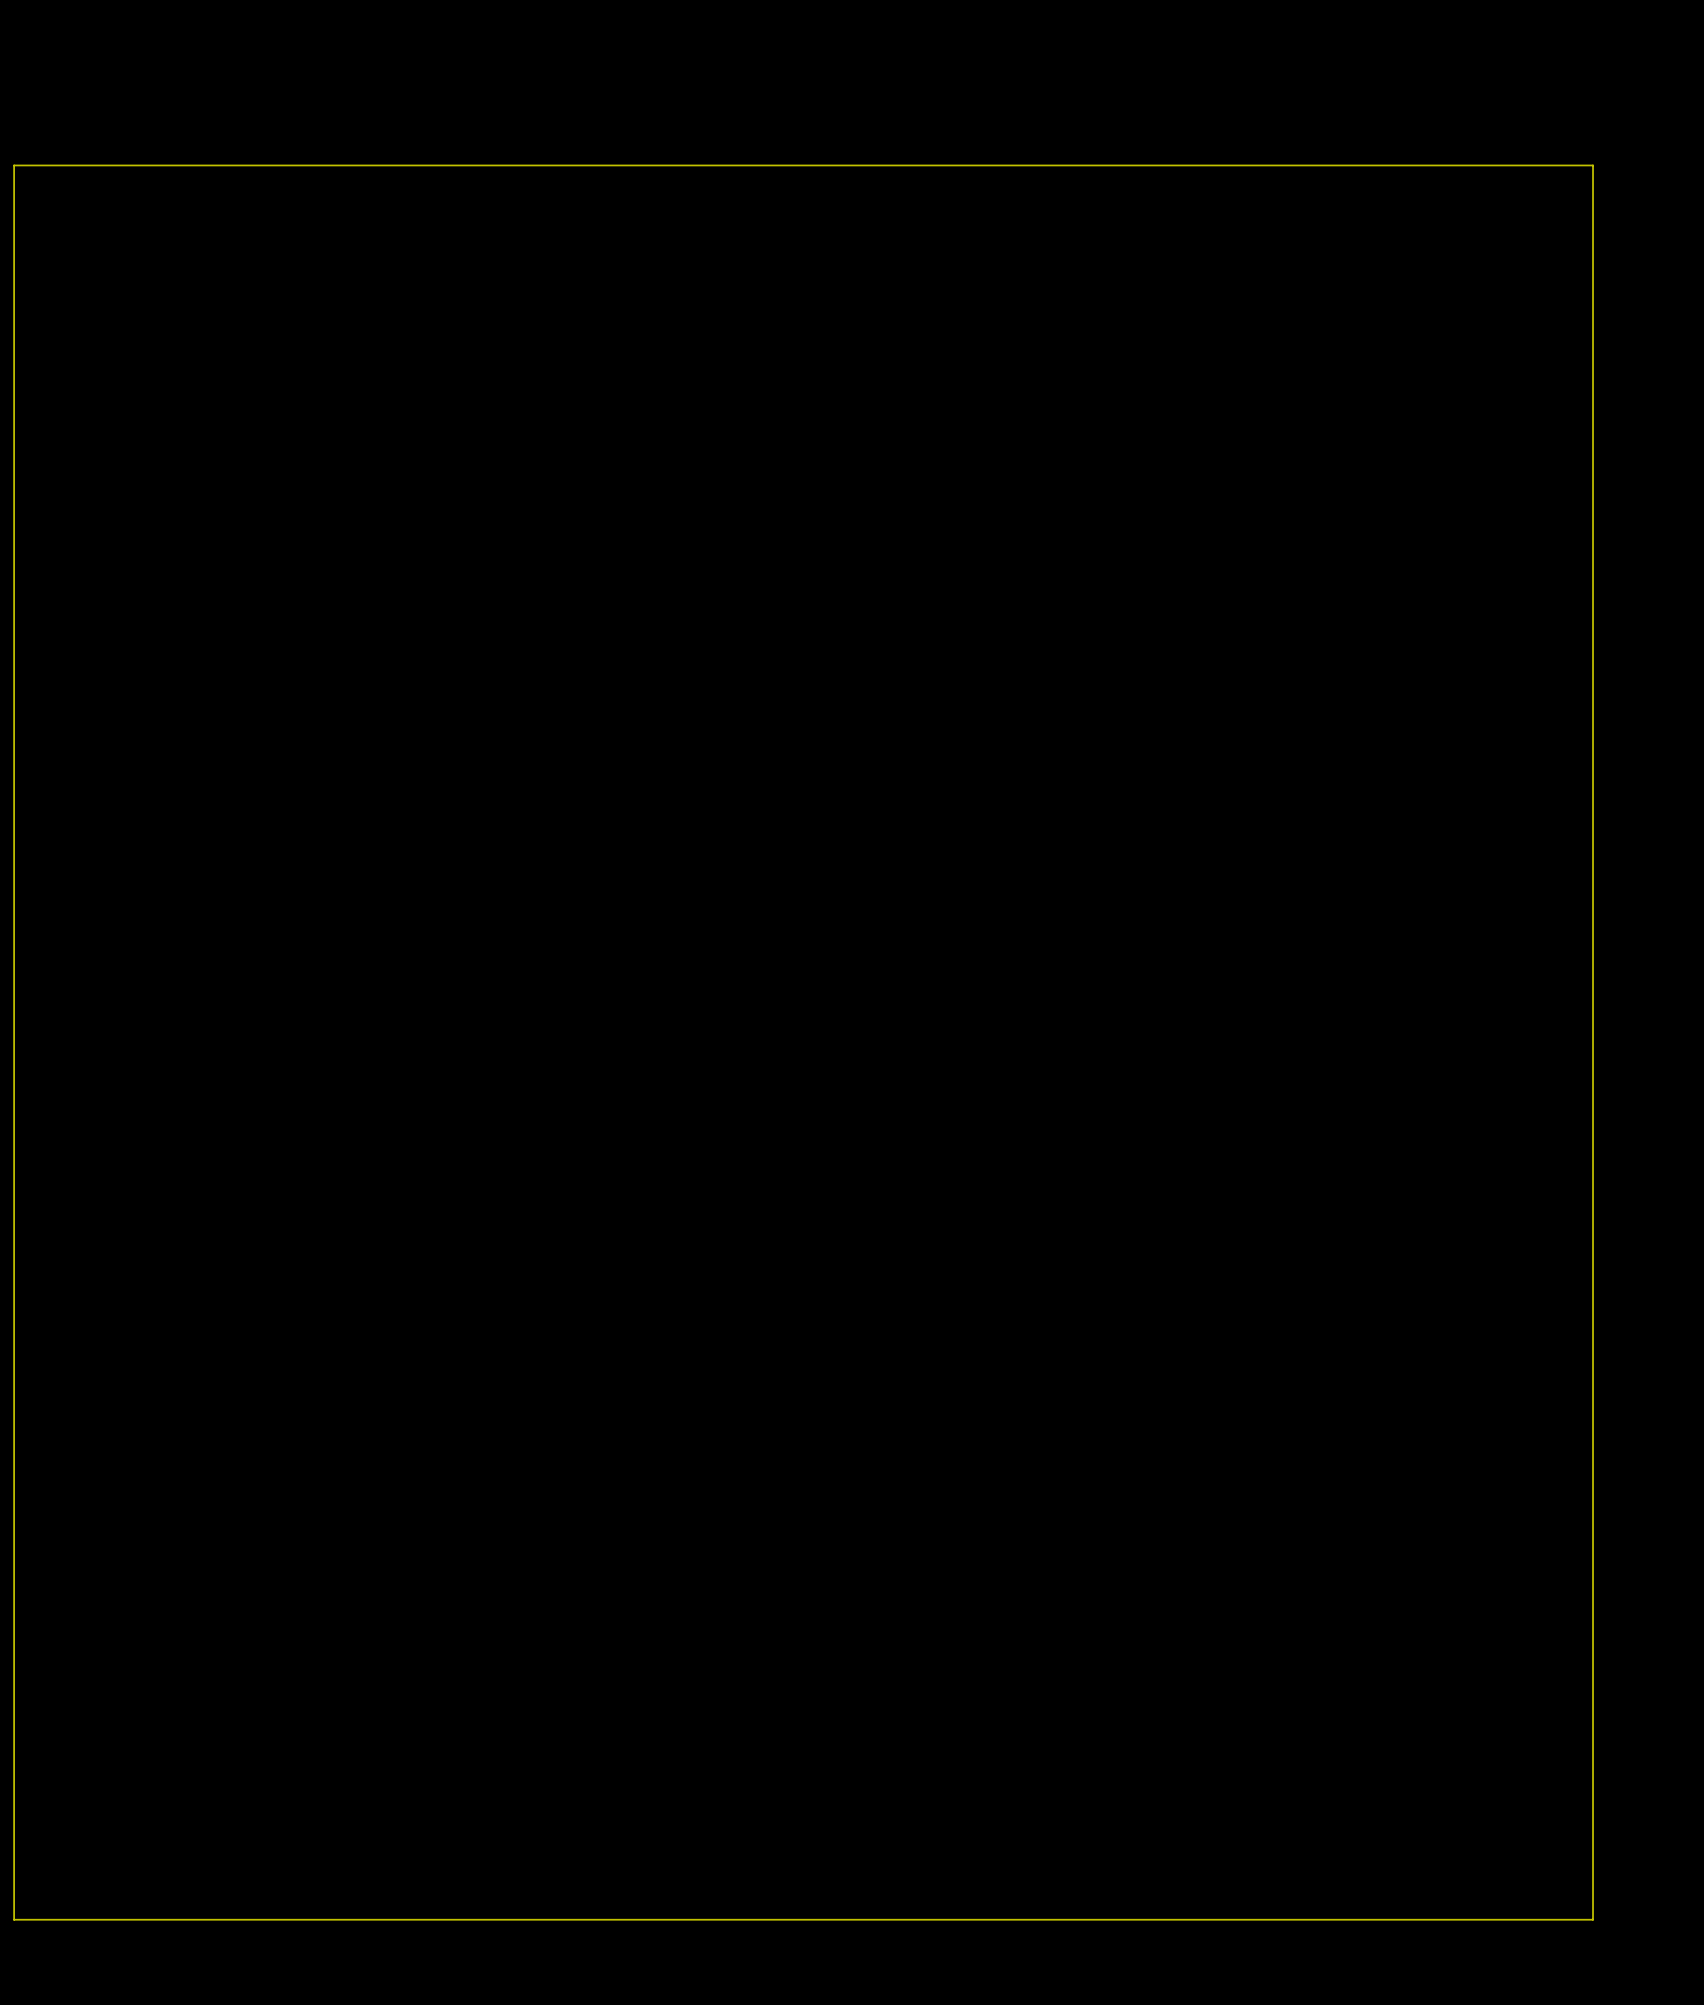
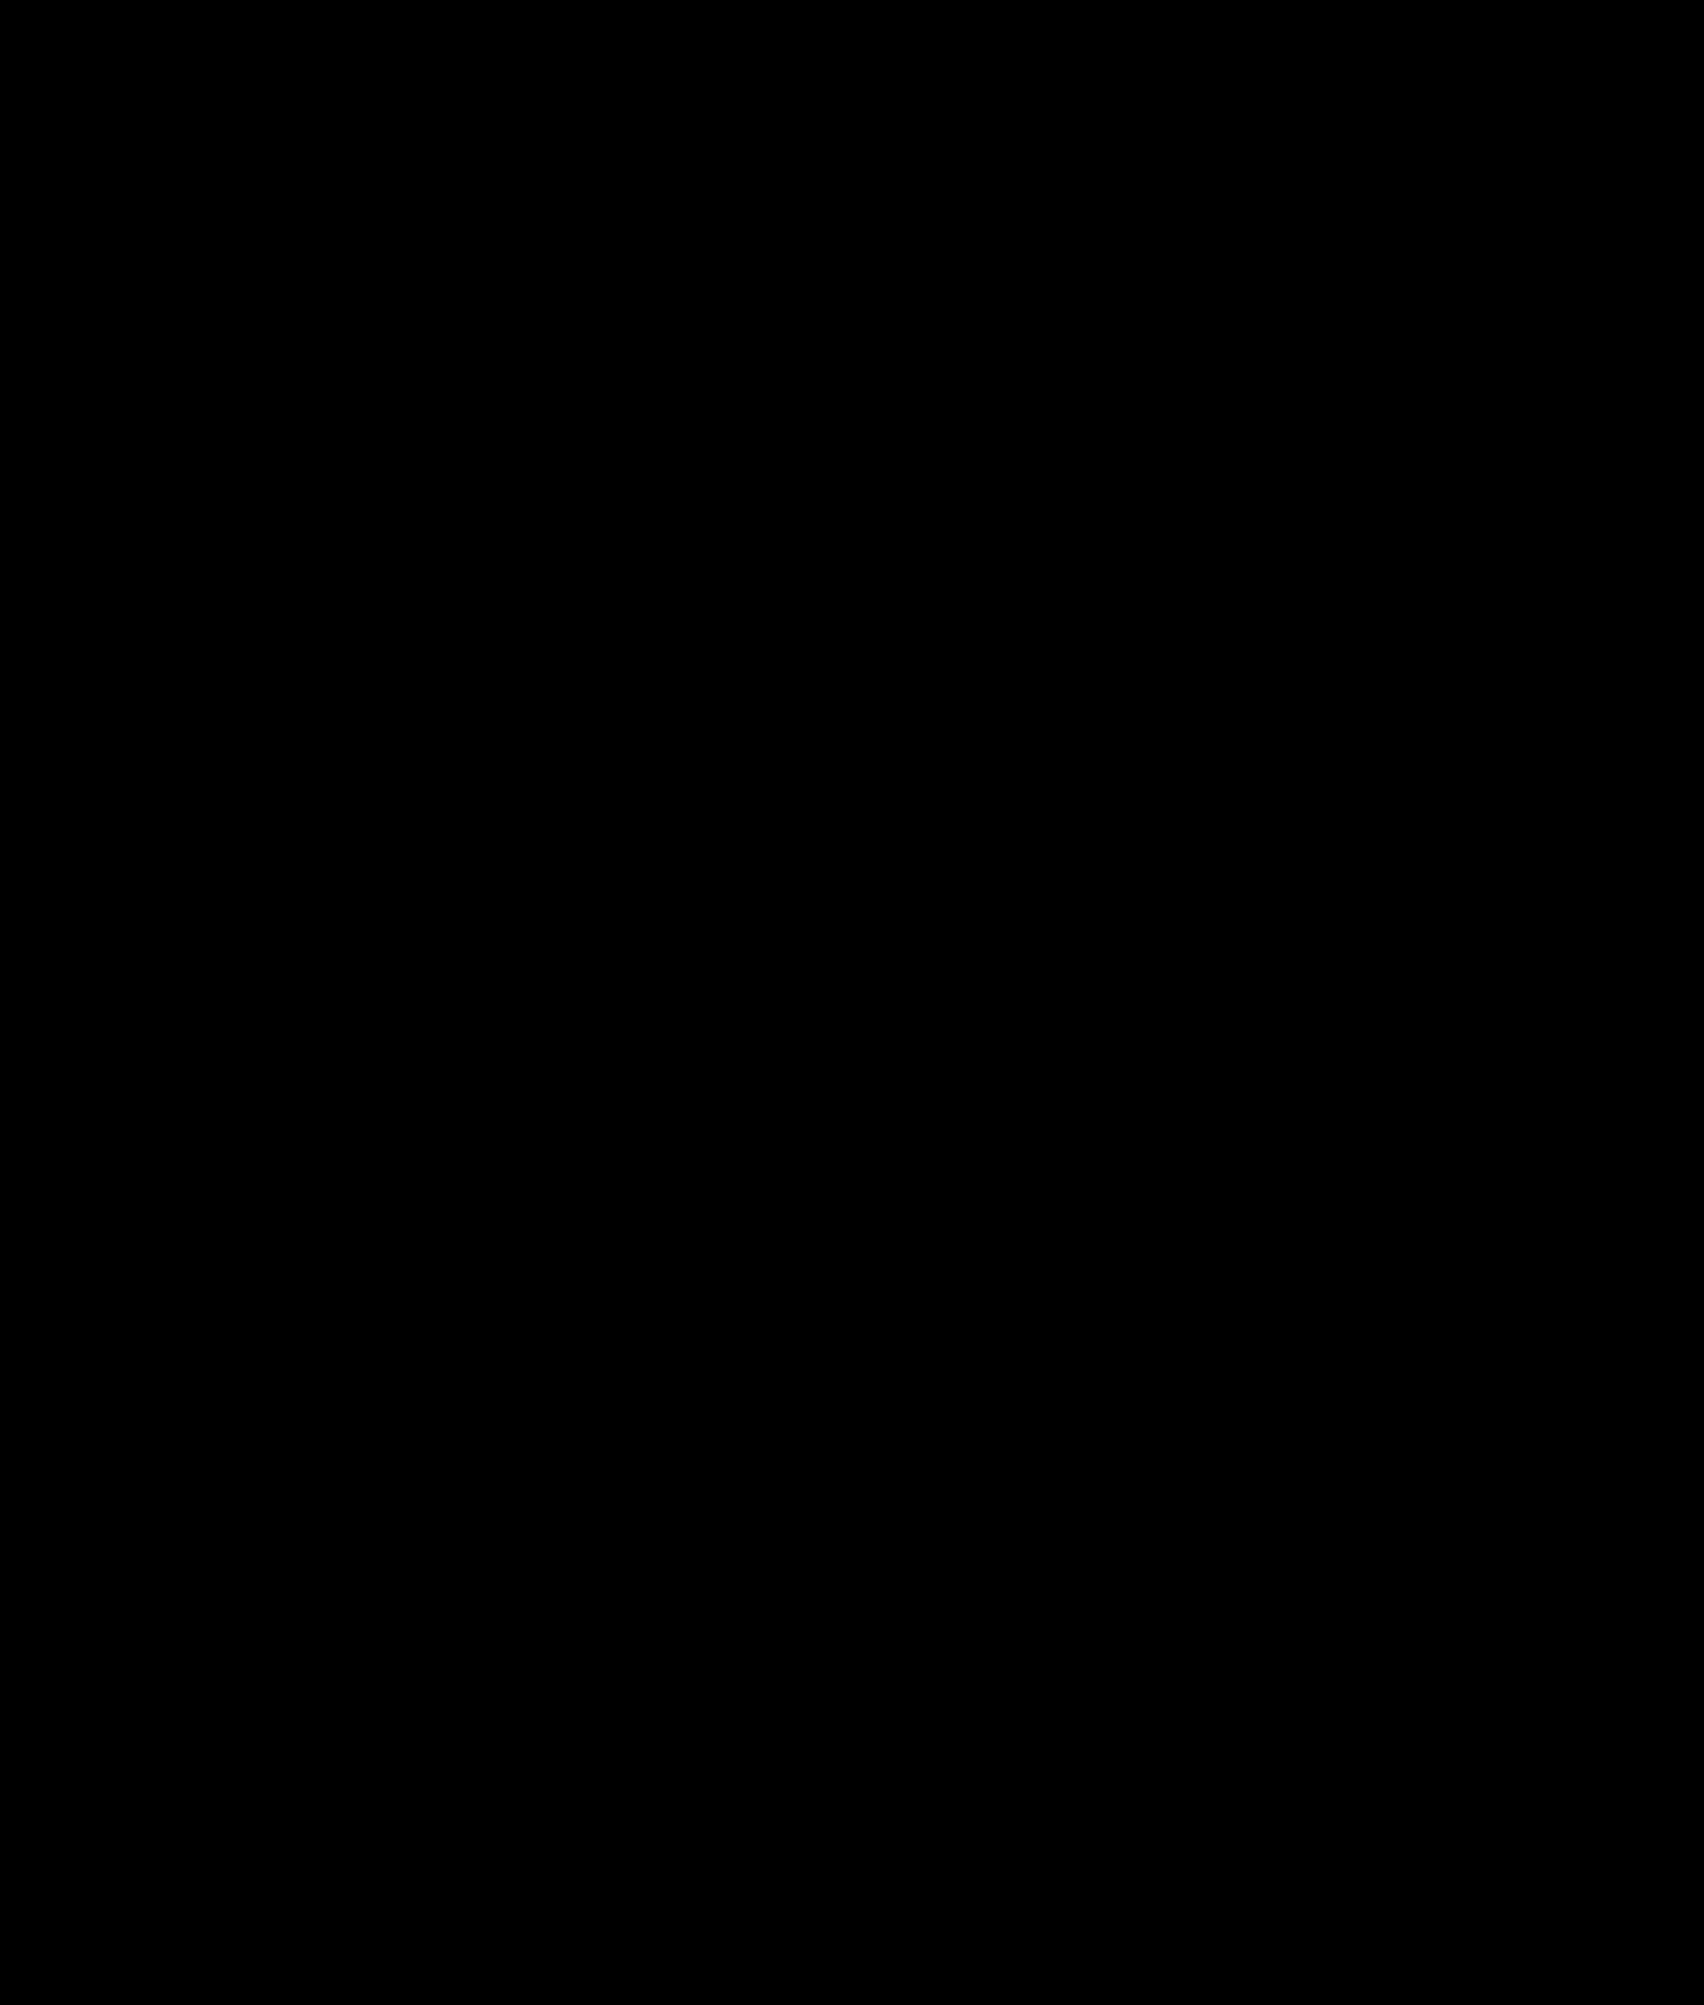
board edge: (14, 165) (14, 1919) (1593, 1919) (1593, 165) (14, 165) -> none

